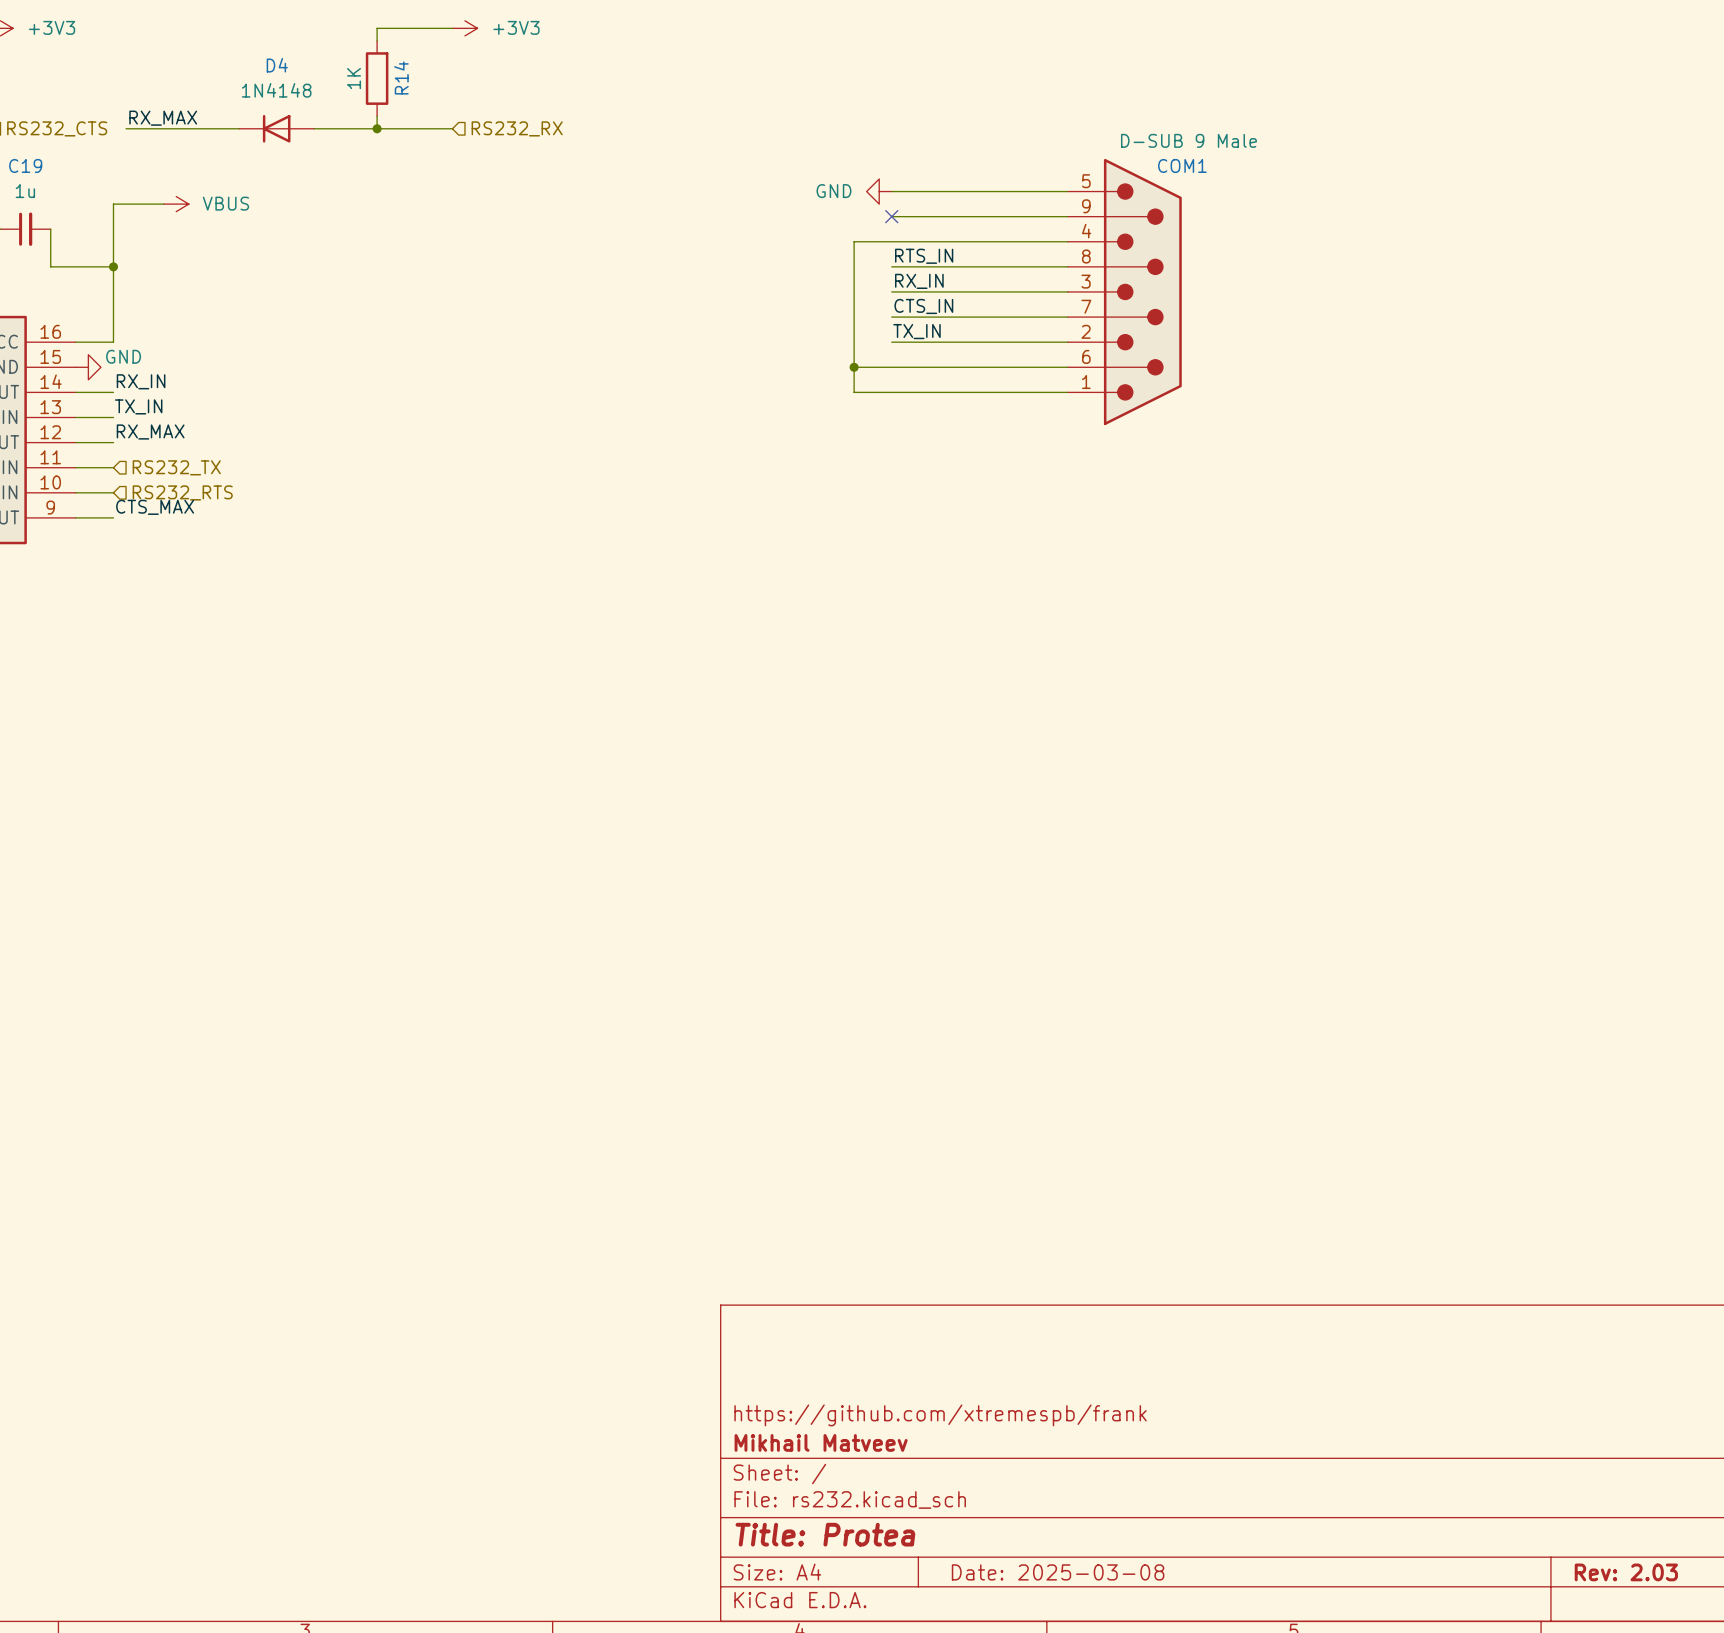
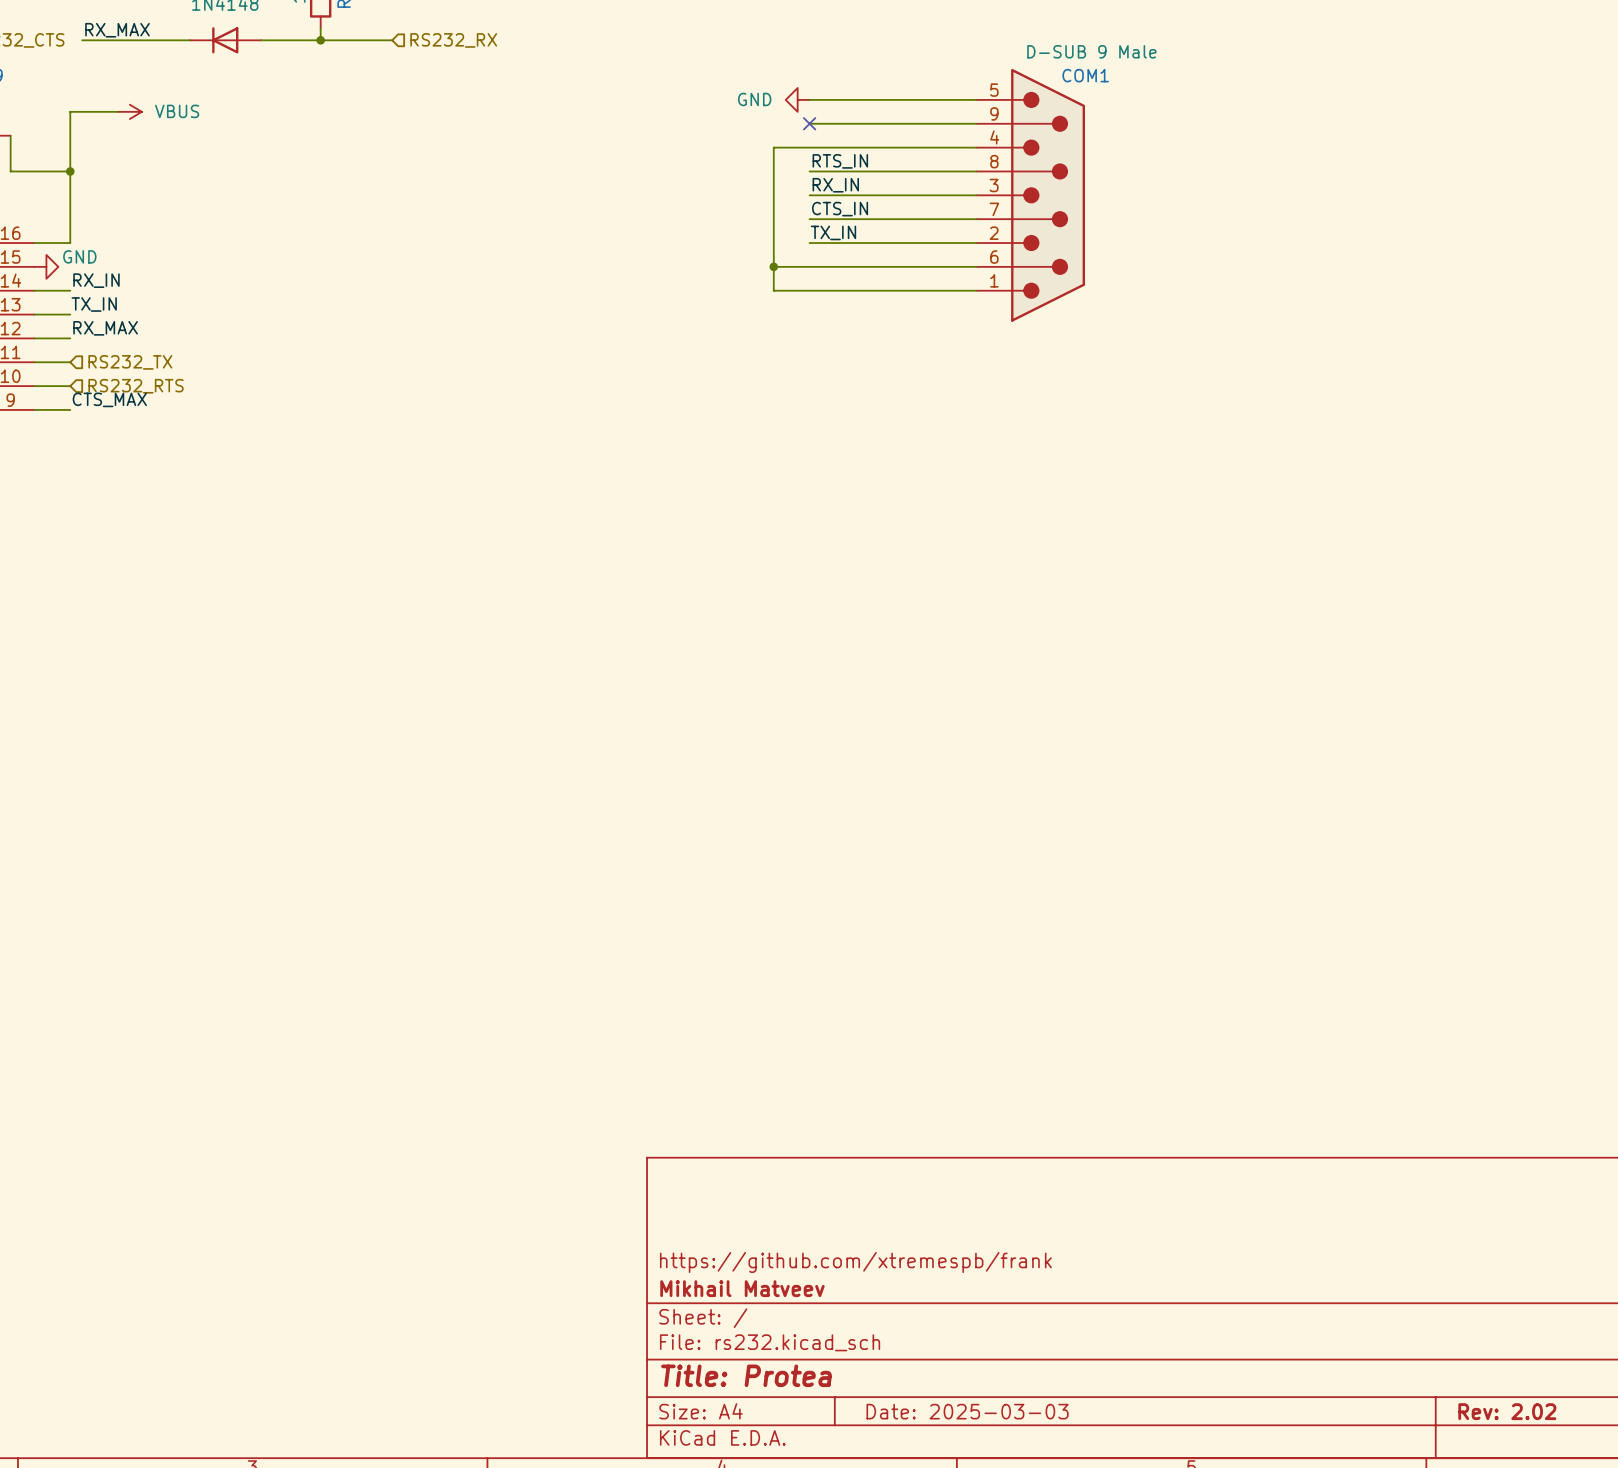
title block: Date: 2025-03-08 (1058, 1572) -> Date: 2025-03-03 (967, 1411)
title block: Rev: 2.03 (1626, 1572) -> Rev: 2.02 (1507, 1411)

